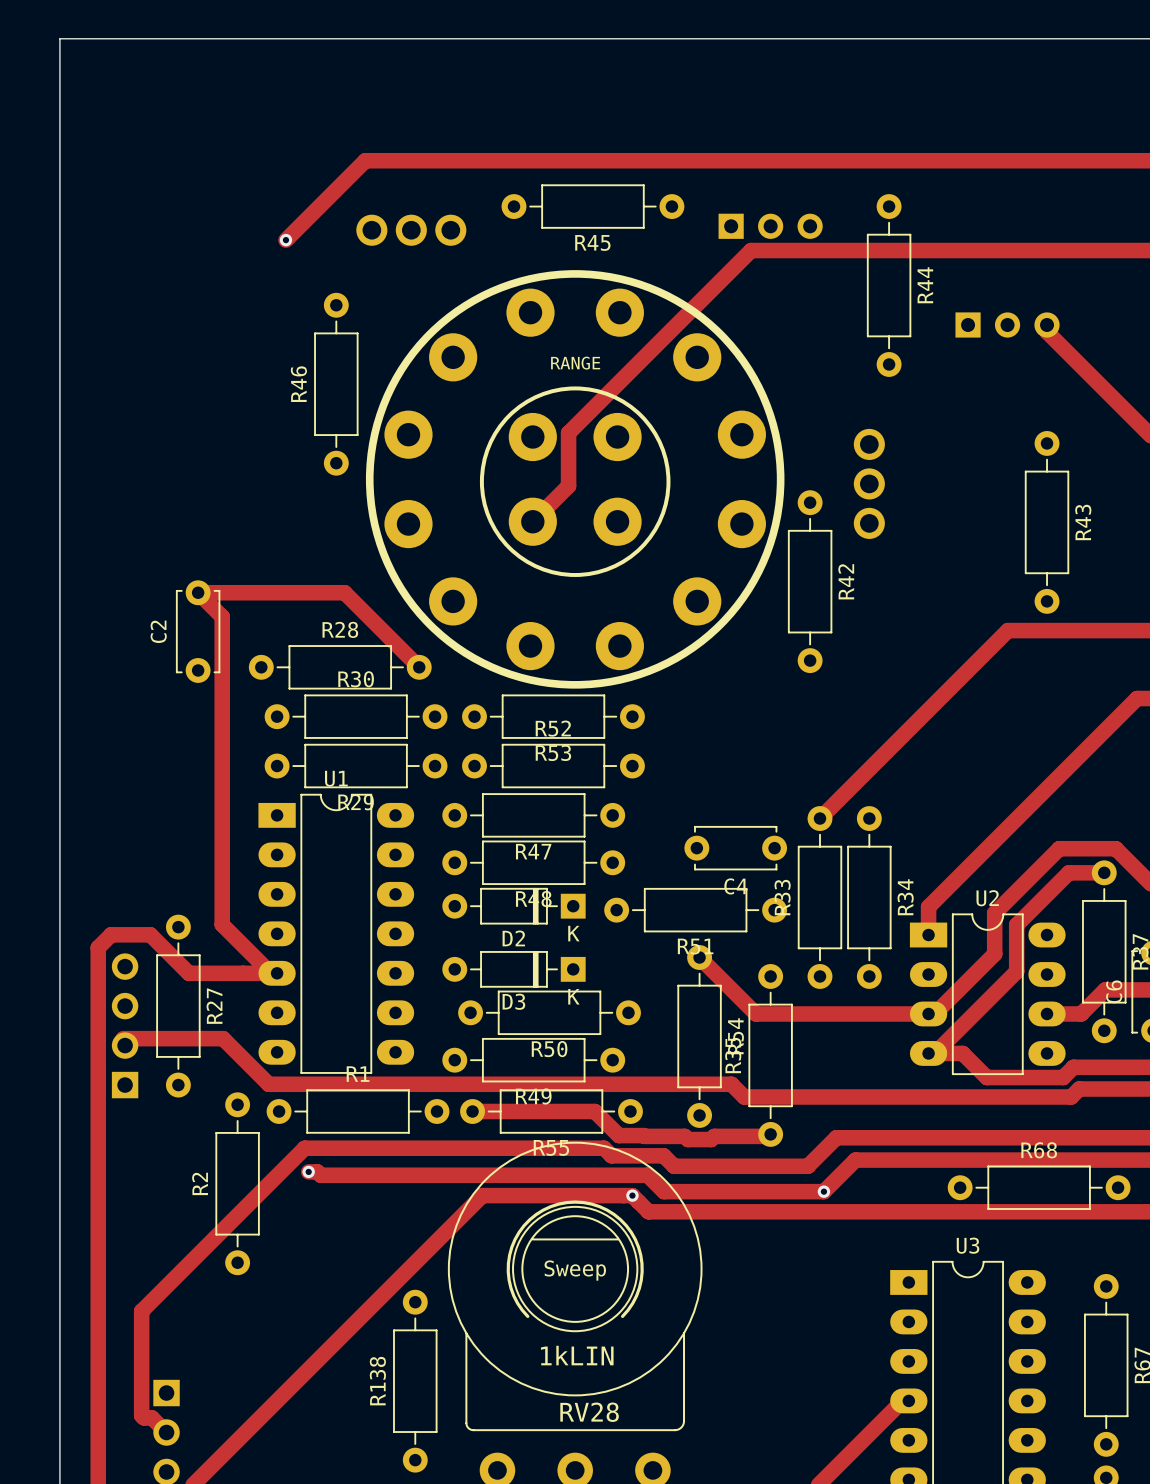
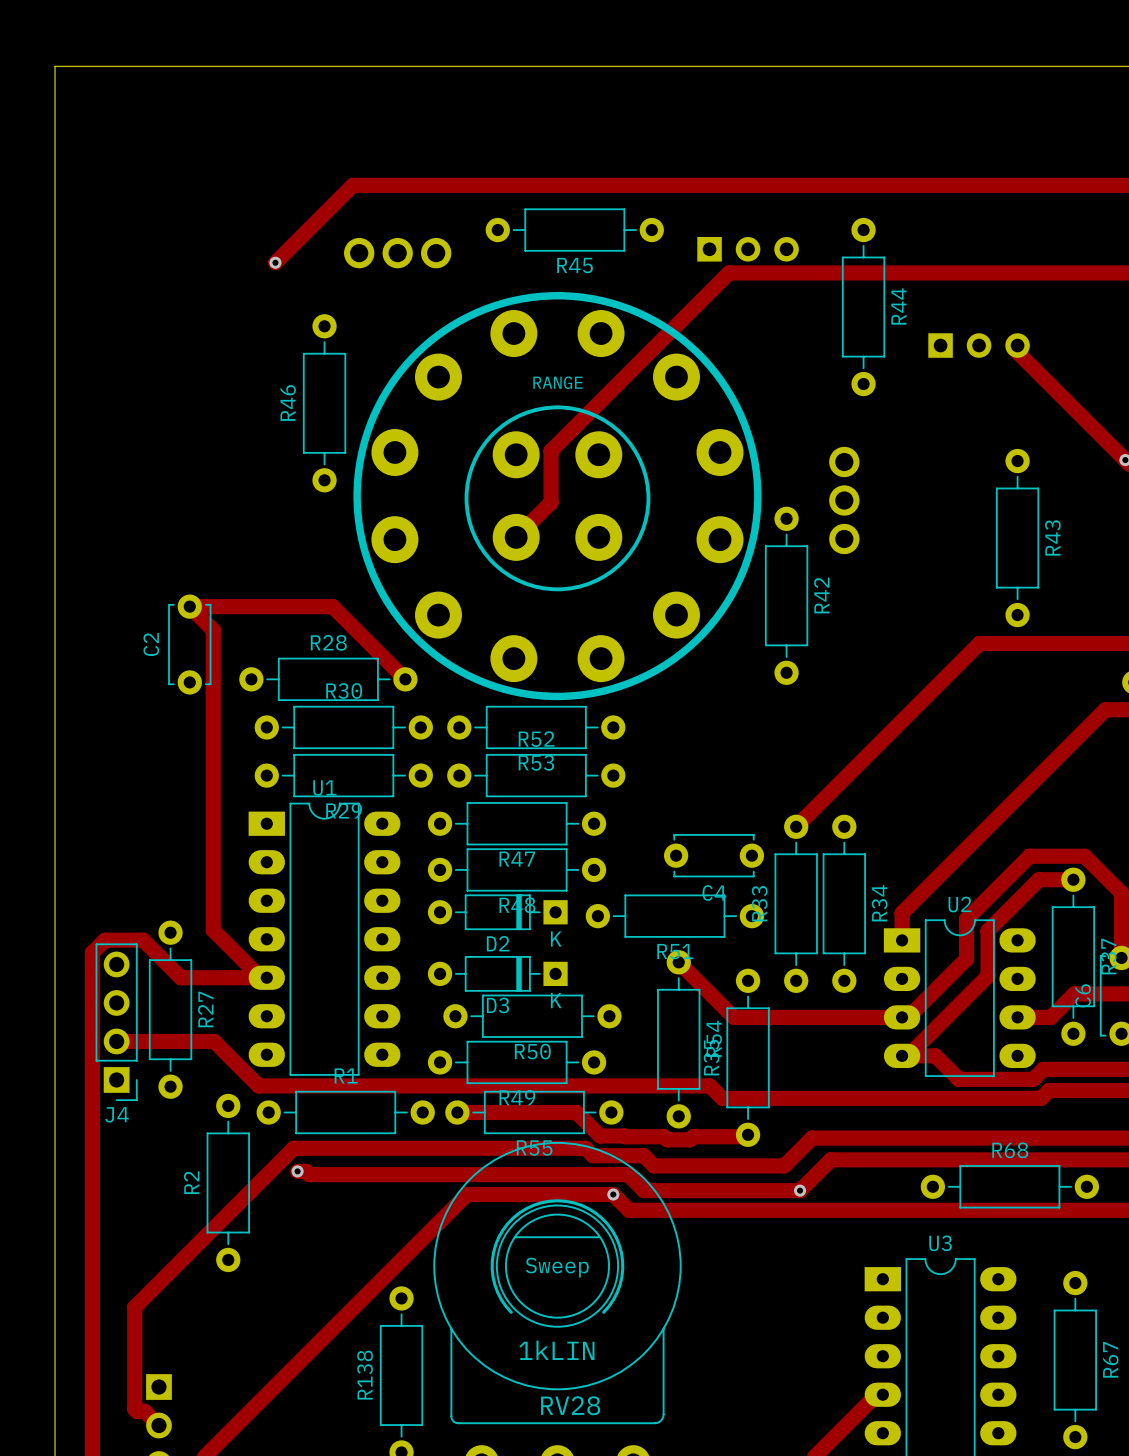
J4 side: bottom (125, 1025) -> top (116, 1022)

